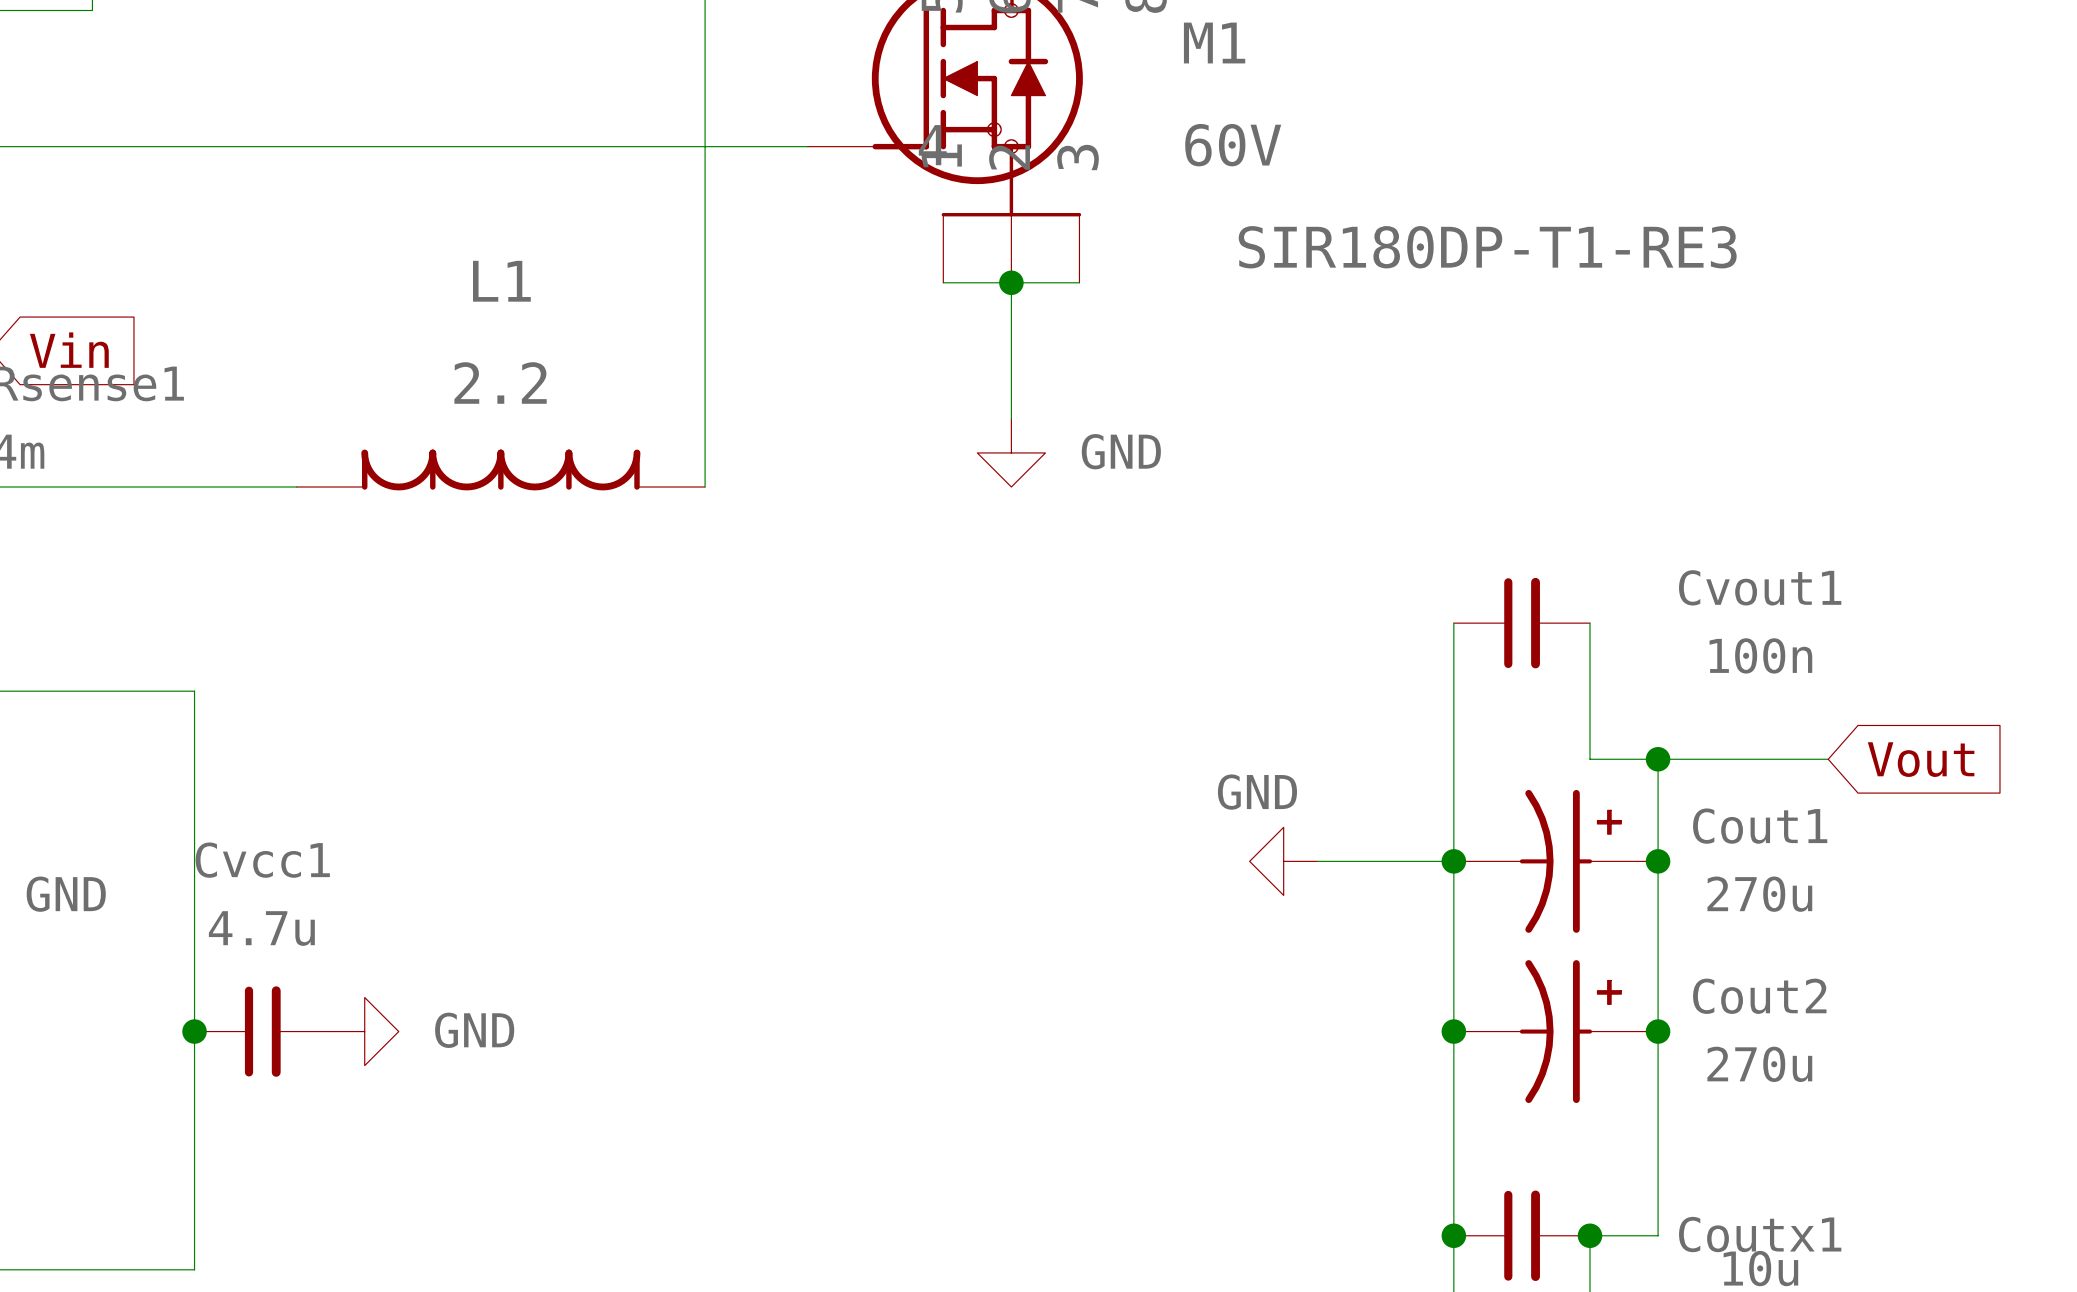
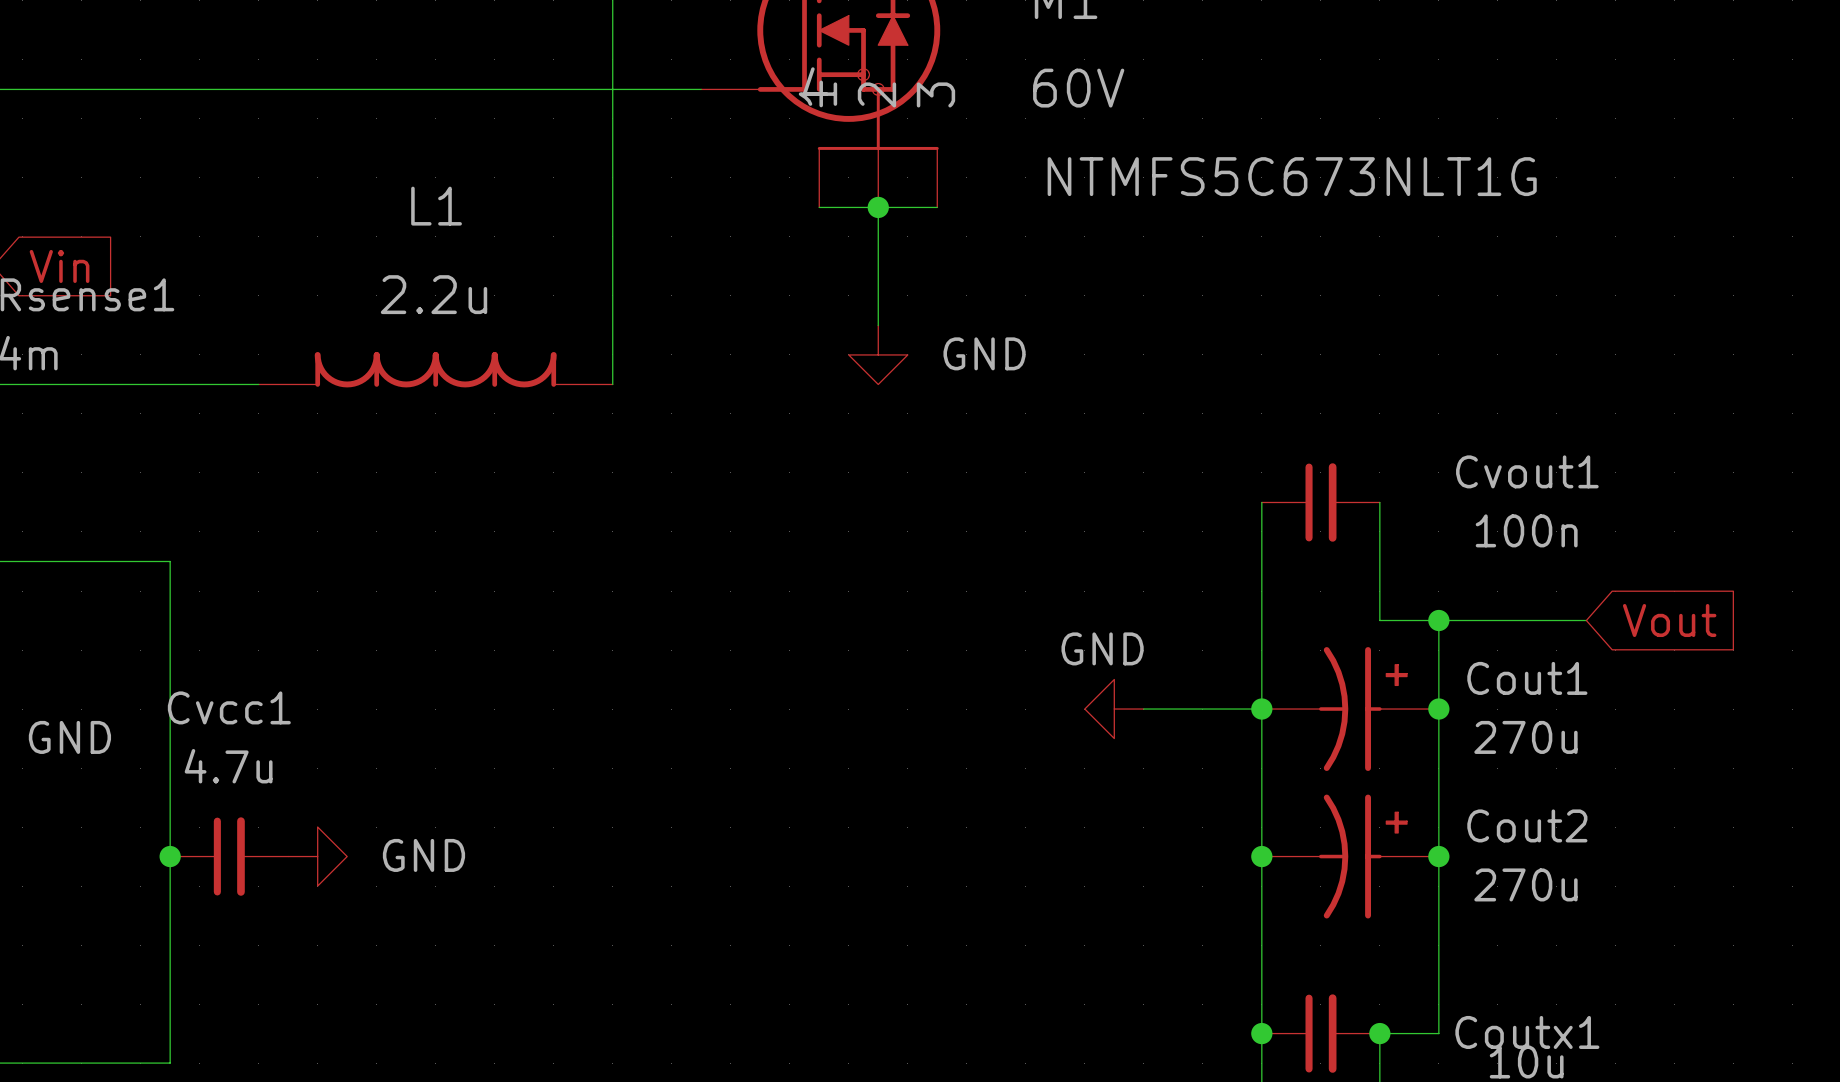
M1 text: SIR180DP-T1-RE3 (1487, 247) -> NTMFS5C673NLT1G (1292, 176)
L1 value: 2.2 (500, 382) -> 2.2u (434, 294)

